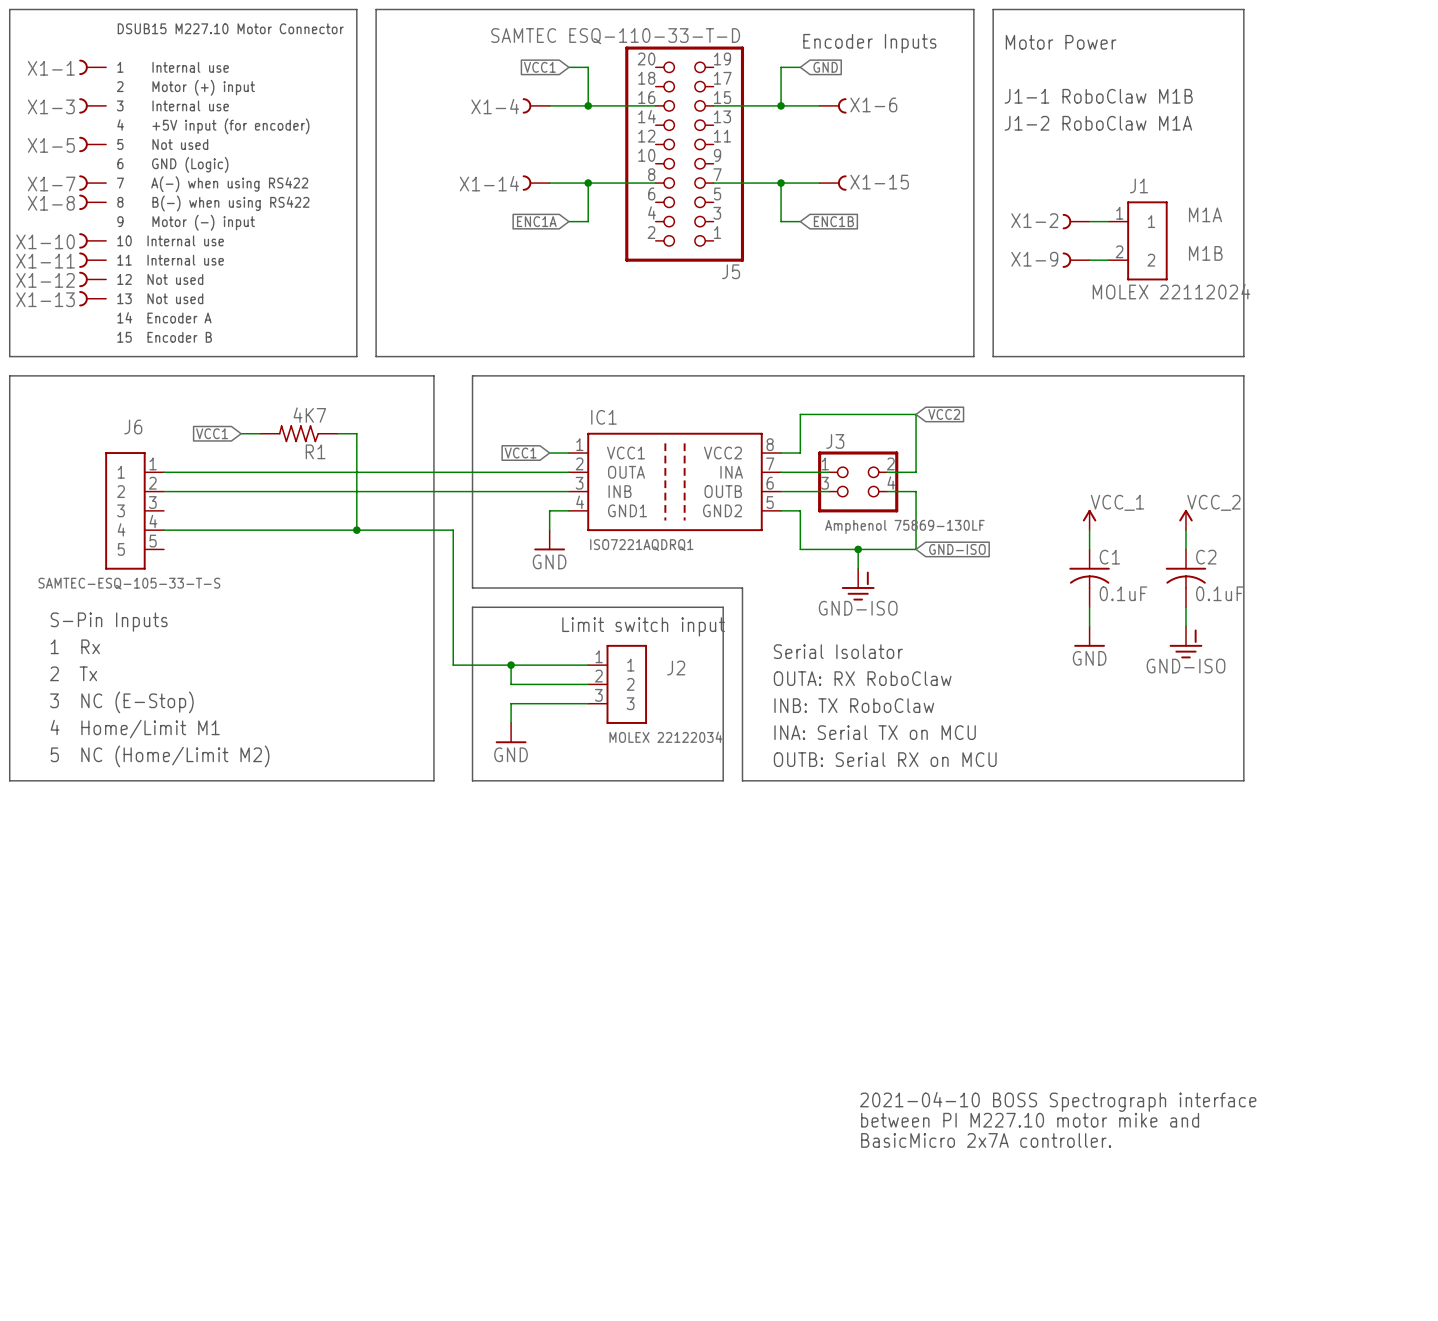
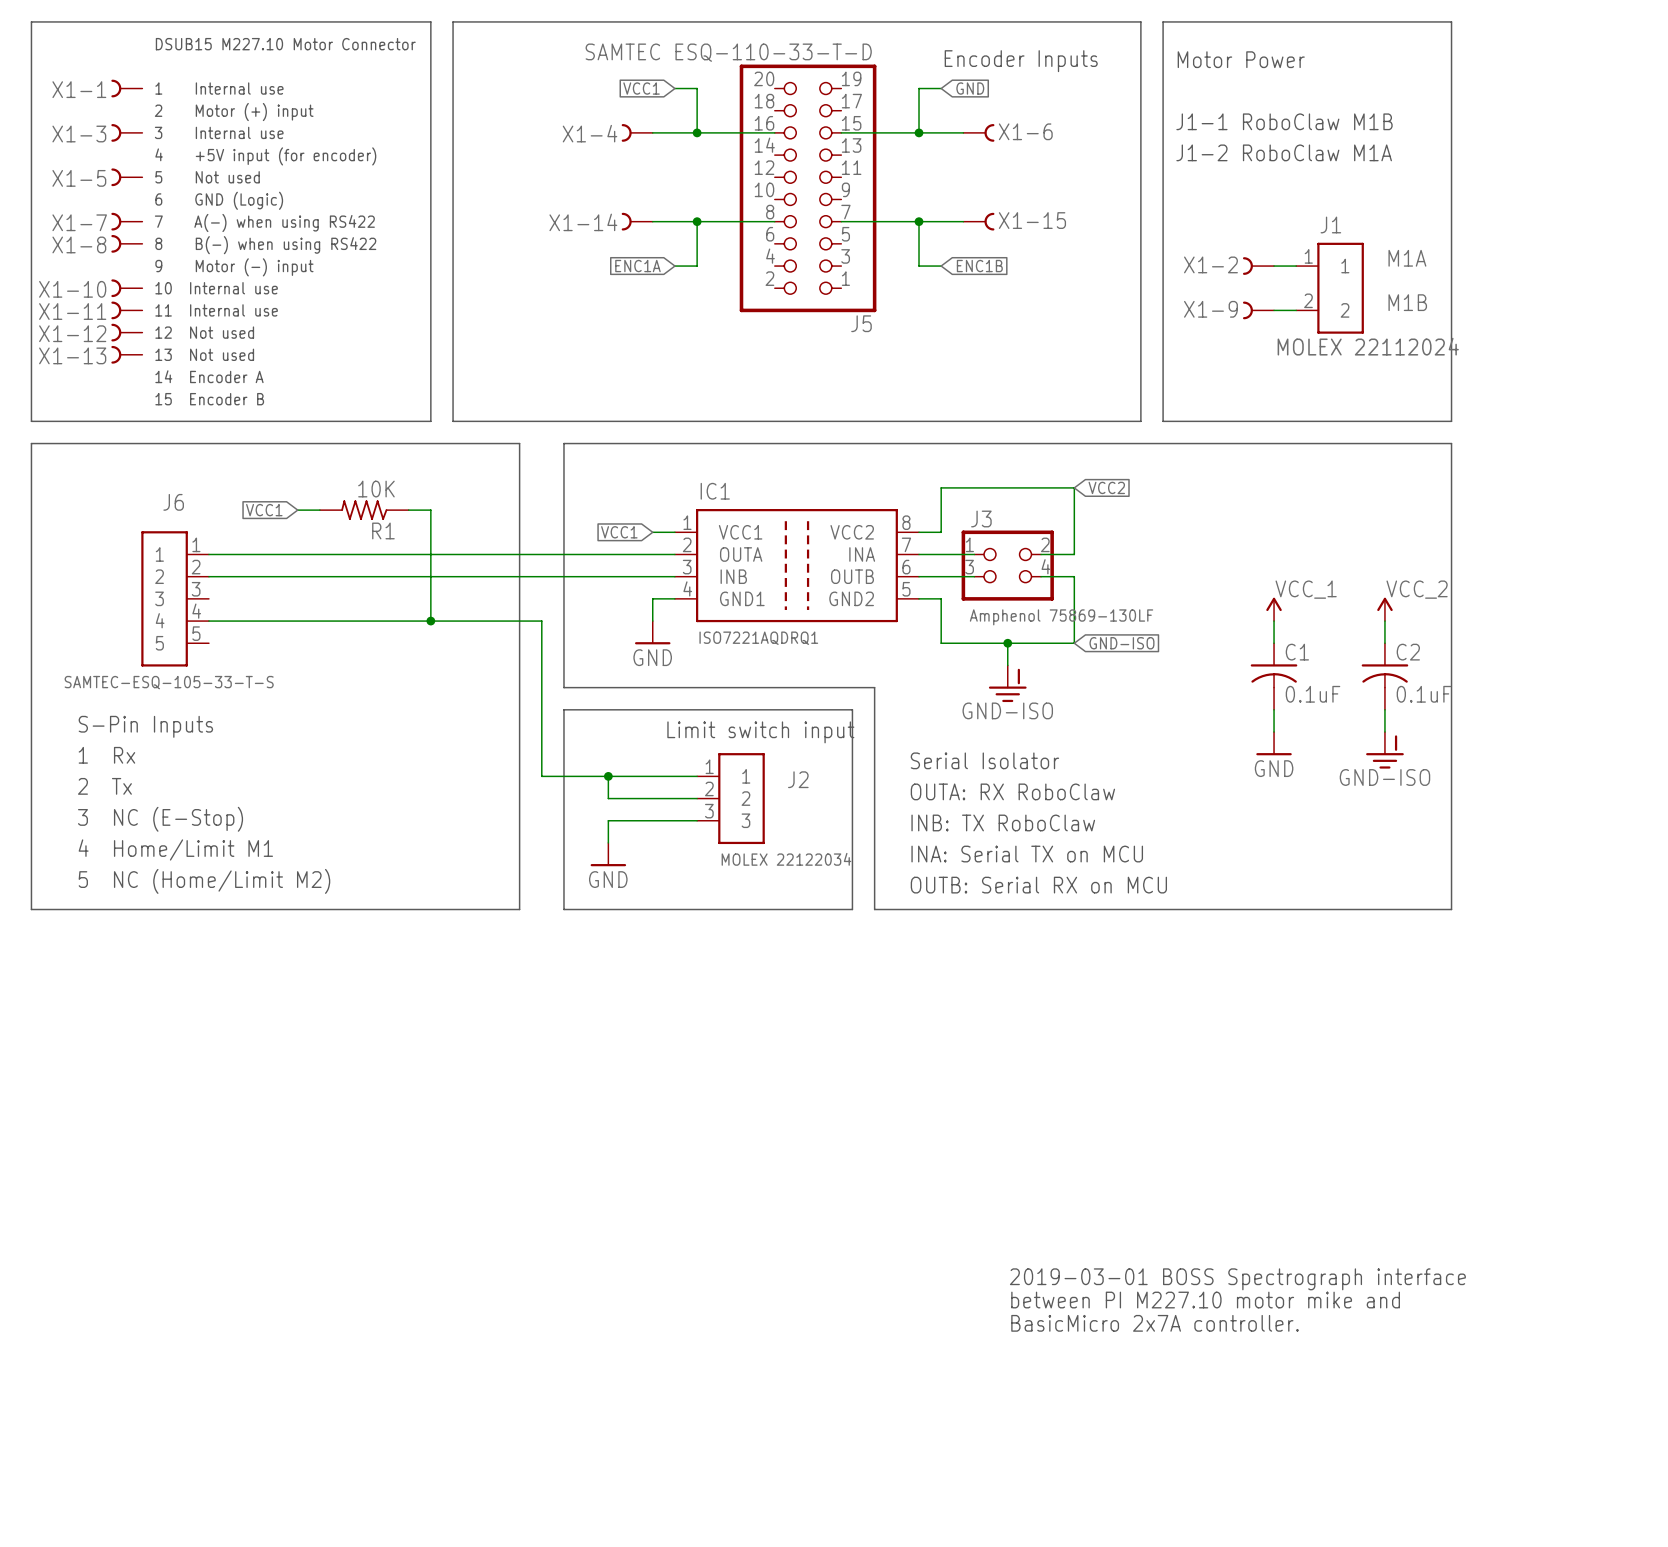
R1 value: 4K7 (309, 415) -> 10K (376, 489)
text: 2021-04-10 BOSS Spectrograph interface (1058, 1101) -> 2019-03-01 BOSS Spectrograph interface (1237, 1279)

